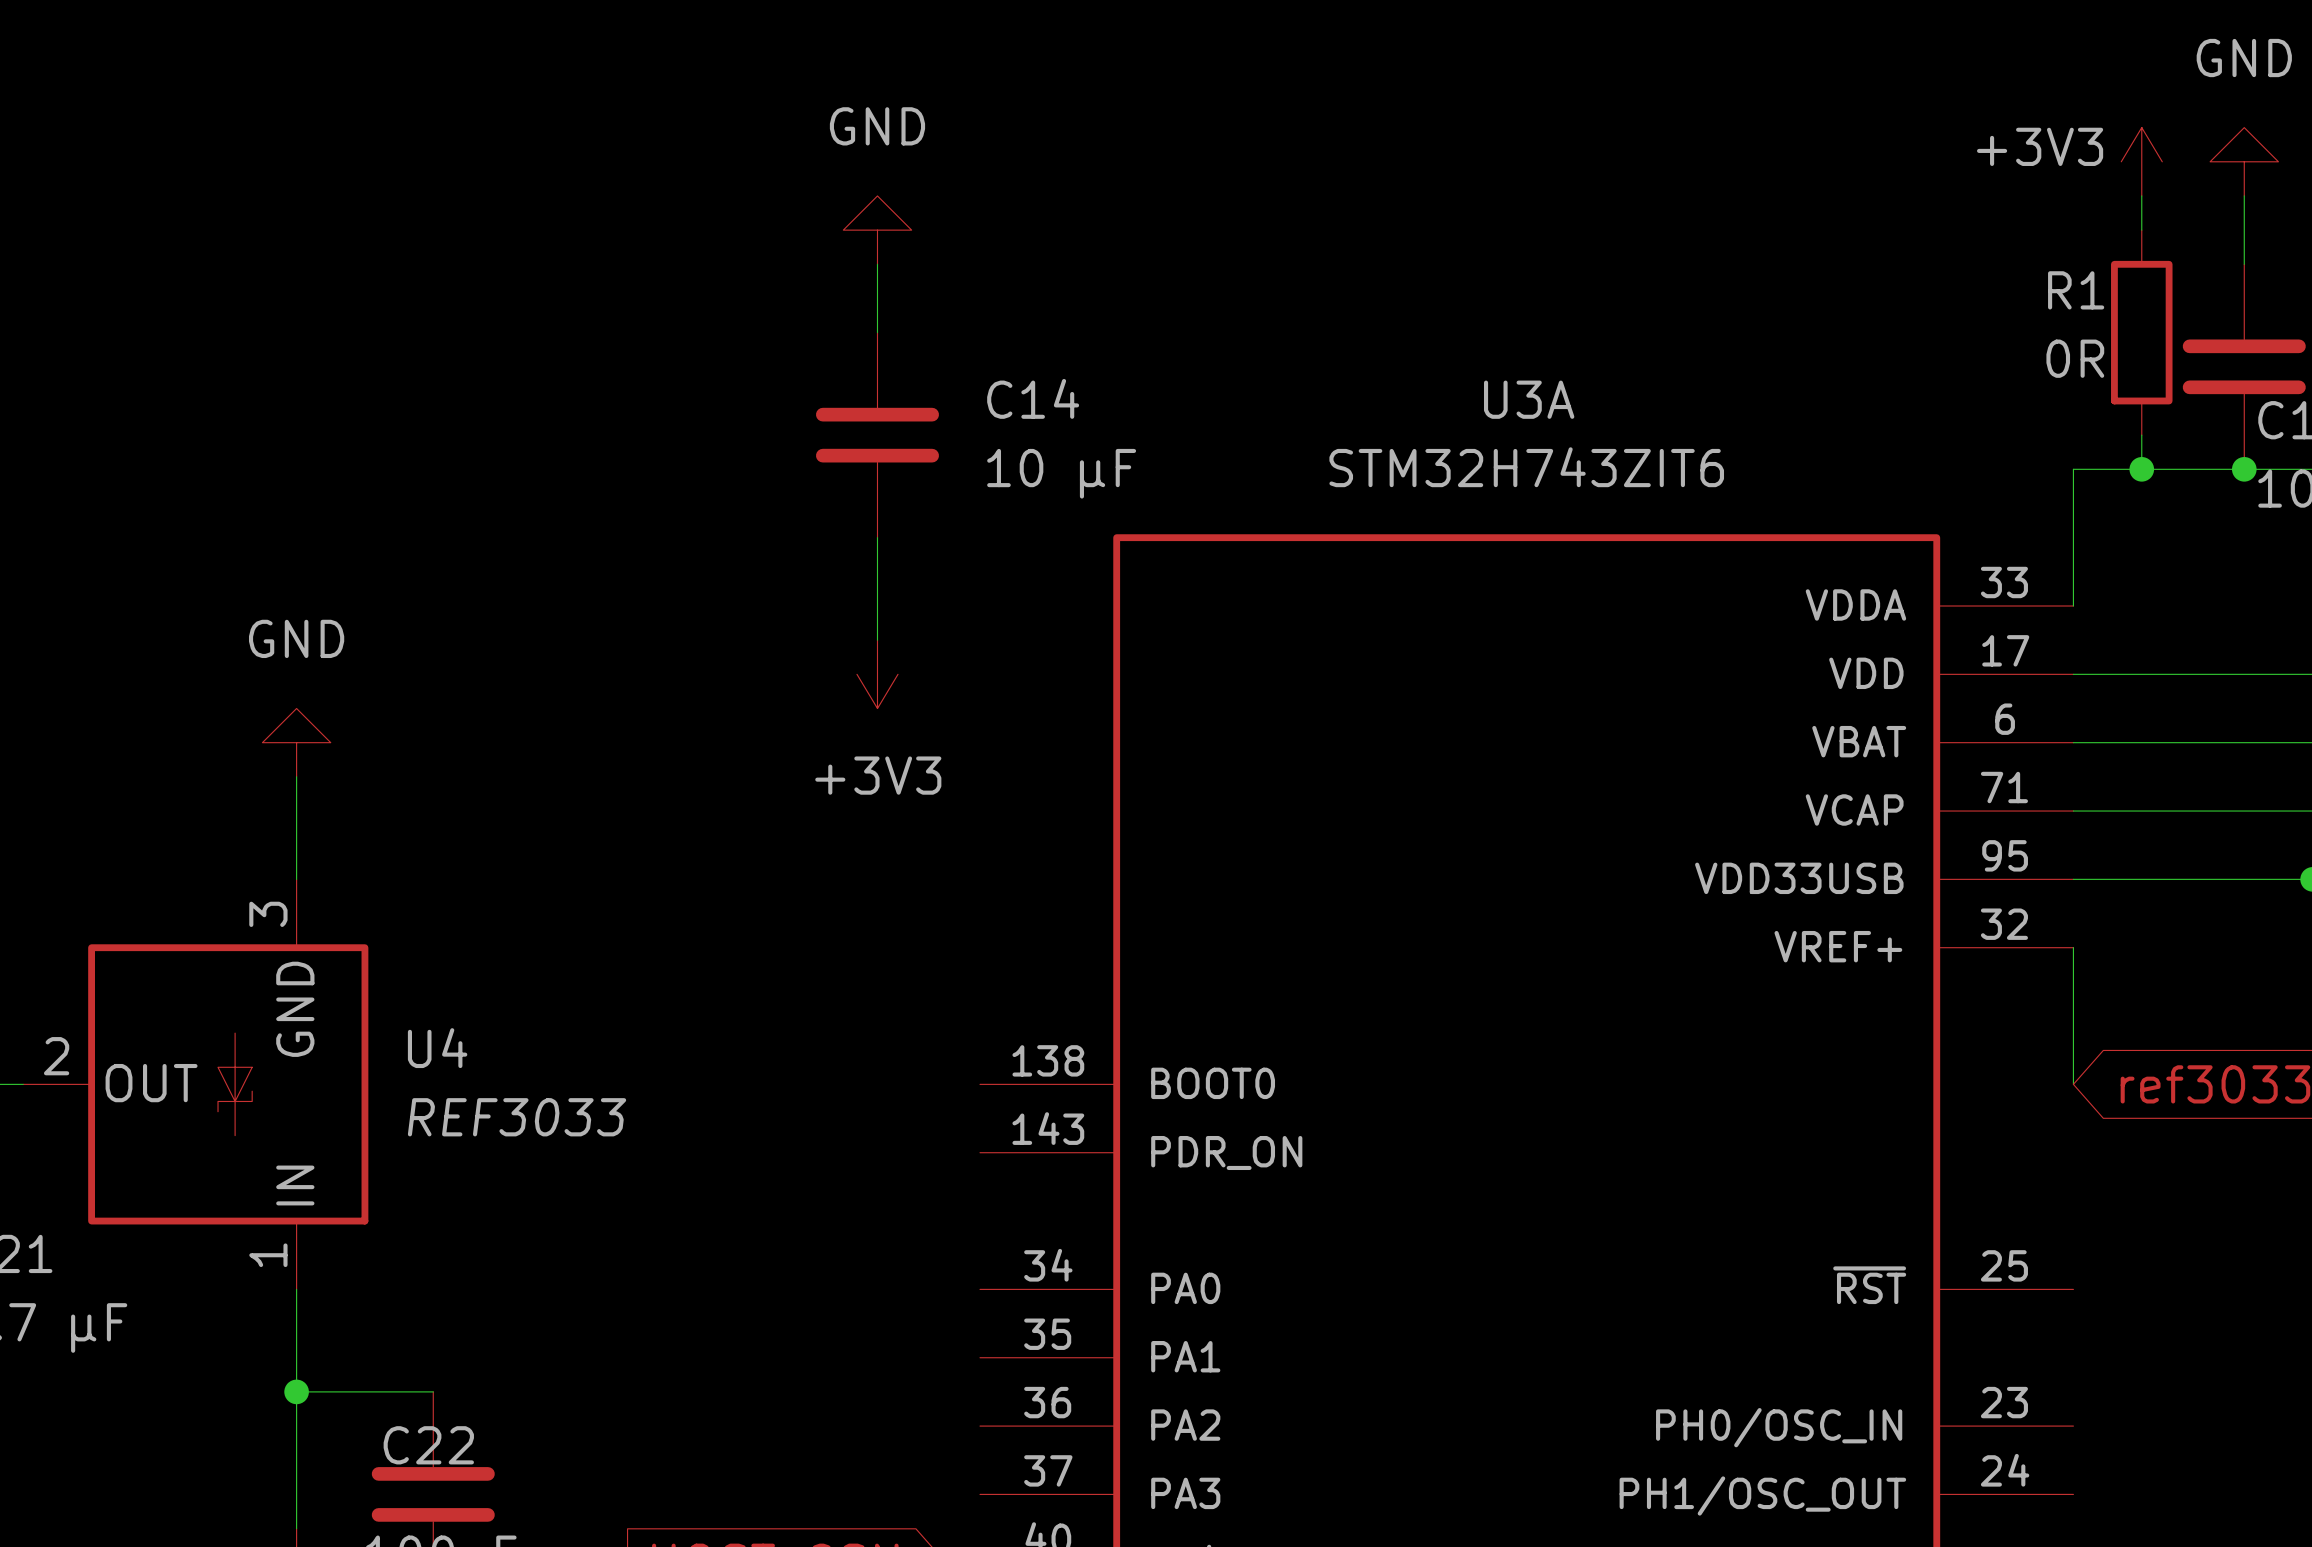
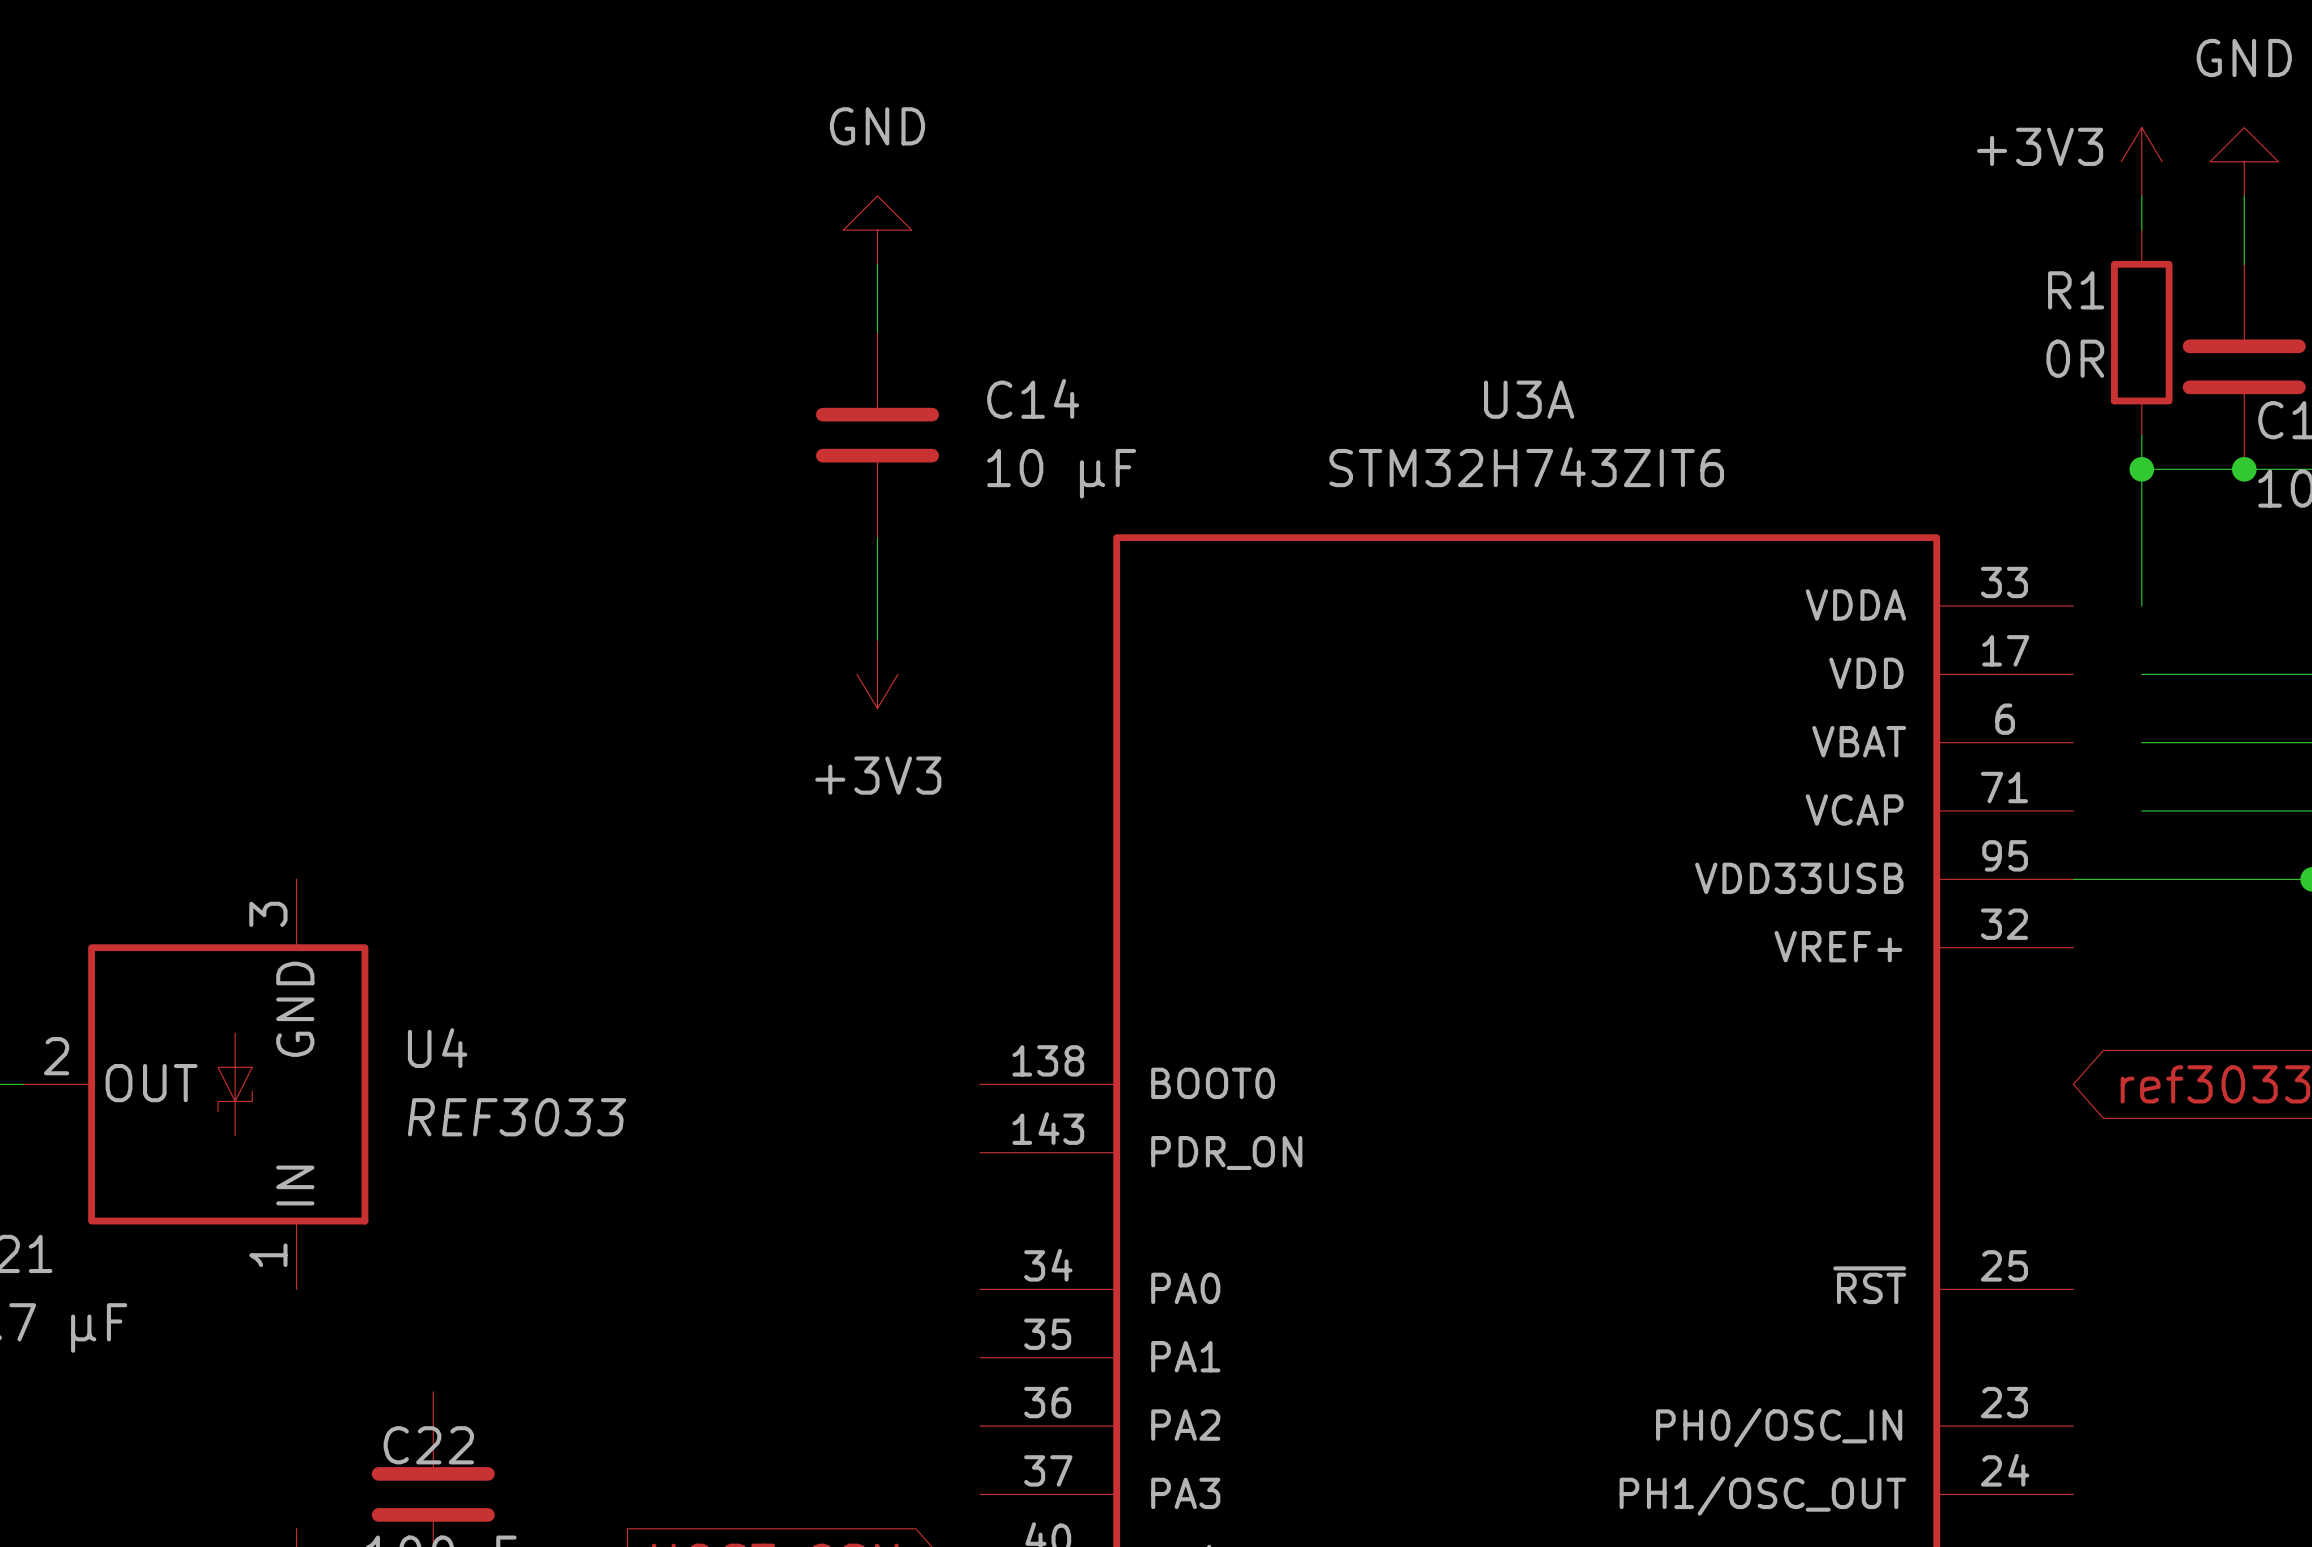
wire: (2141, 469) (2073, 469) (2073, 606) -> (2141, 469) (2141, 606)
wire: (2073, 674) (2141, 674) -> none
power symbol: GND (296, 742) -> none
wire: (2073, 742) (2141, 742) -> none
wire: (296, 776) (296, 879) -> none
wire: (2073, 811) (2141, 811) -> none
wire: (2073, 947) (2073, 1084) -> none
wire: (296, 1289) (296, 1528) -> none
wire: (296, 1391) (433, 1391) -> none
junction: (296, 1391) -> none

